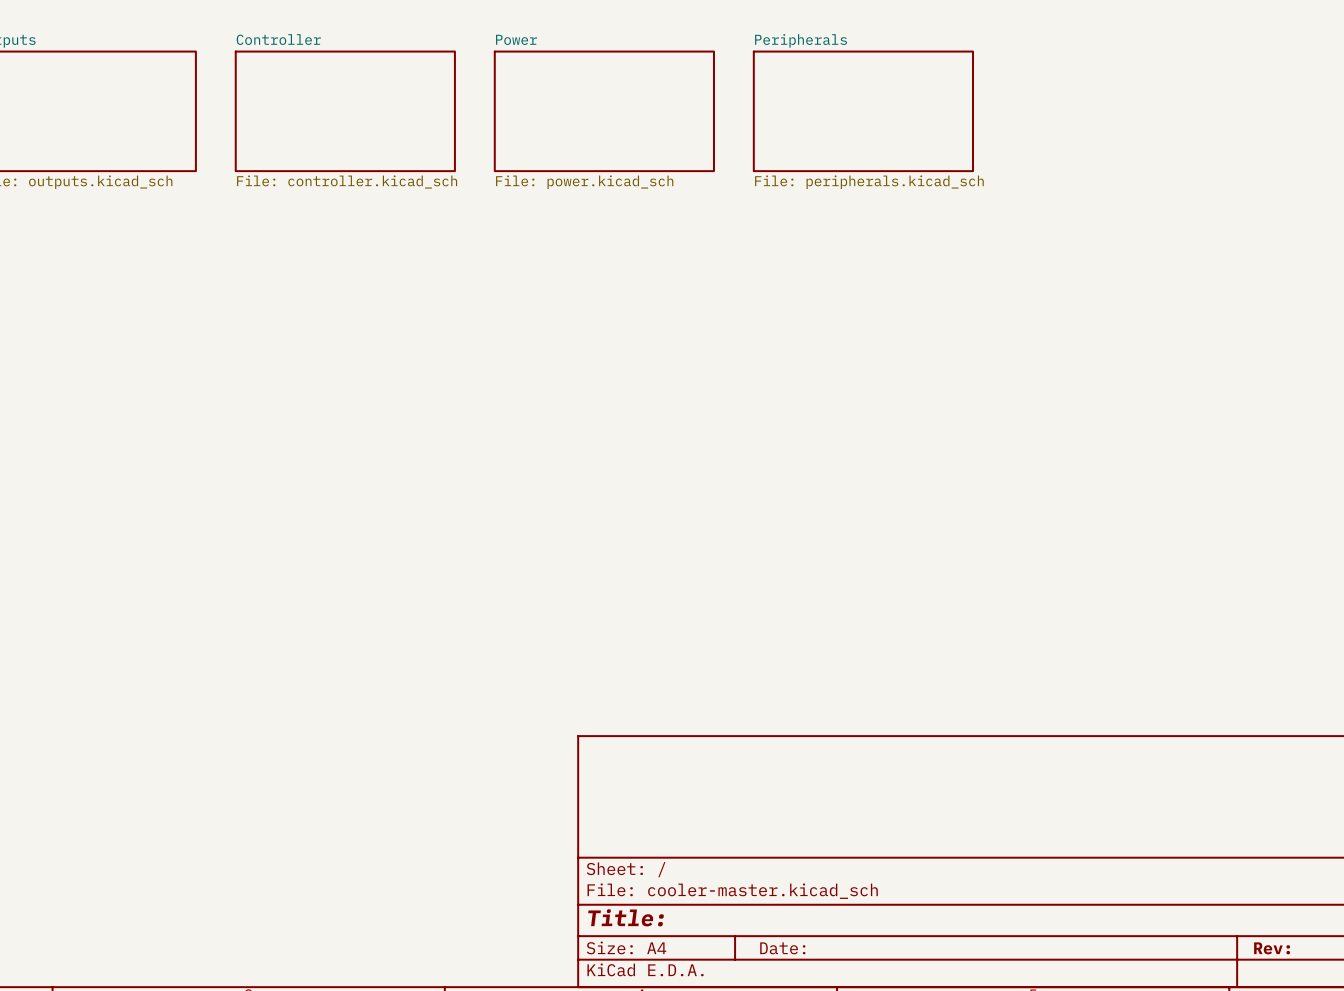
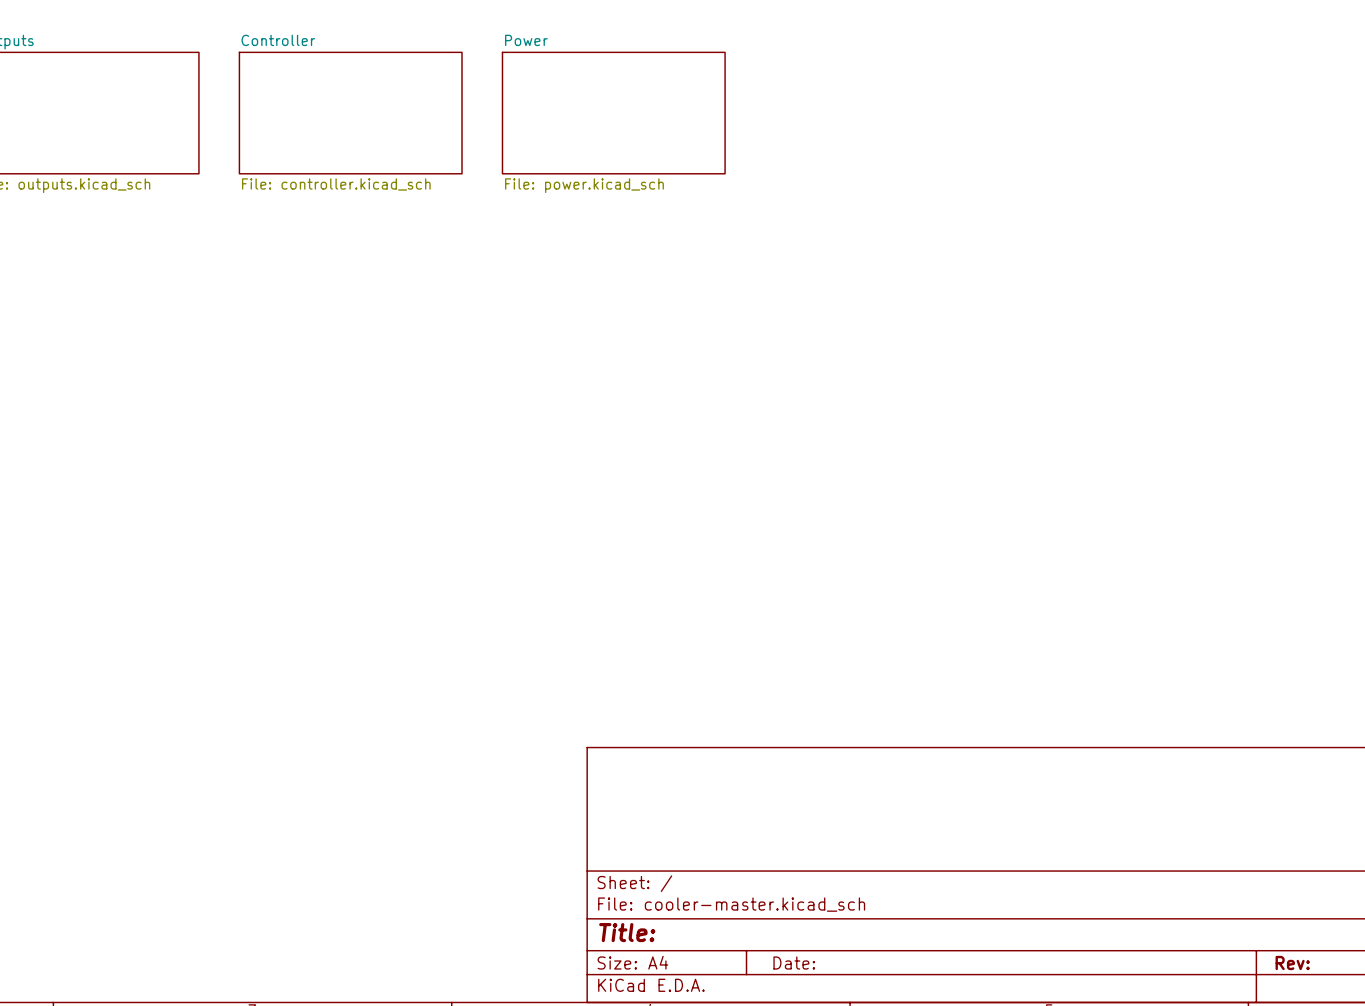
sheet Peripherals: File: peripherals.kicad_sch (863, 111) -> none

